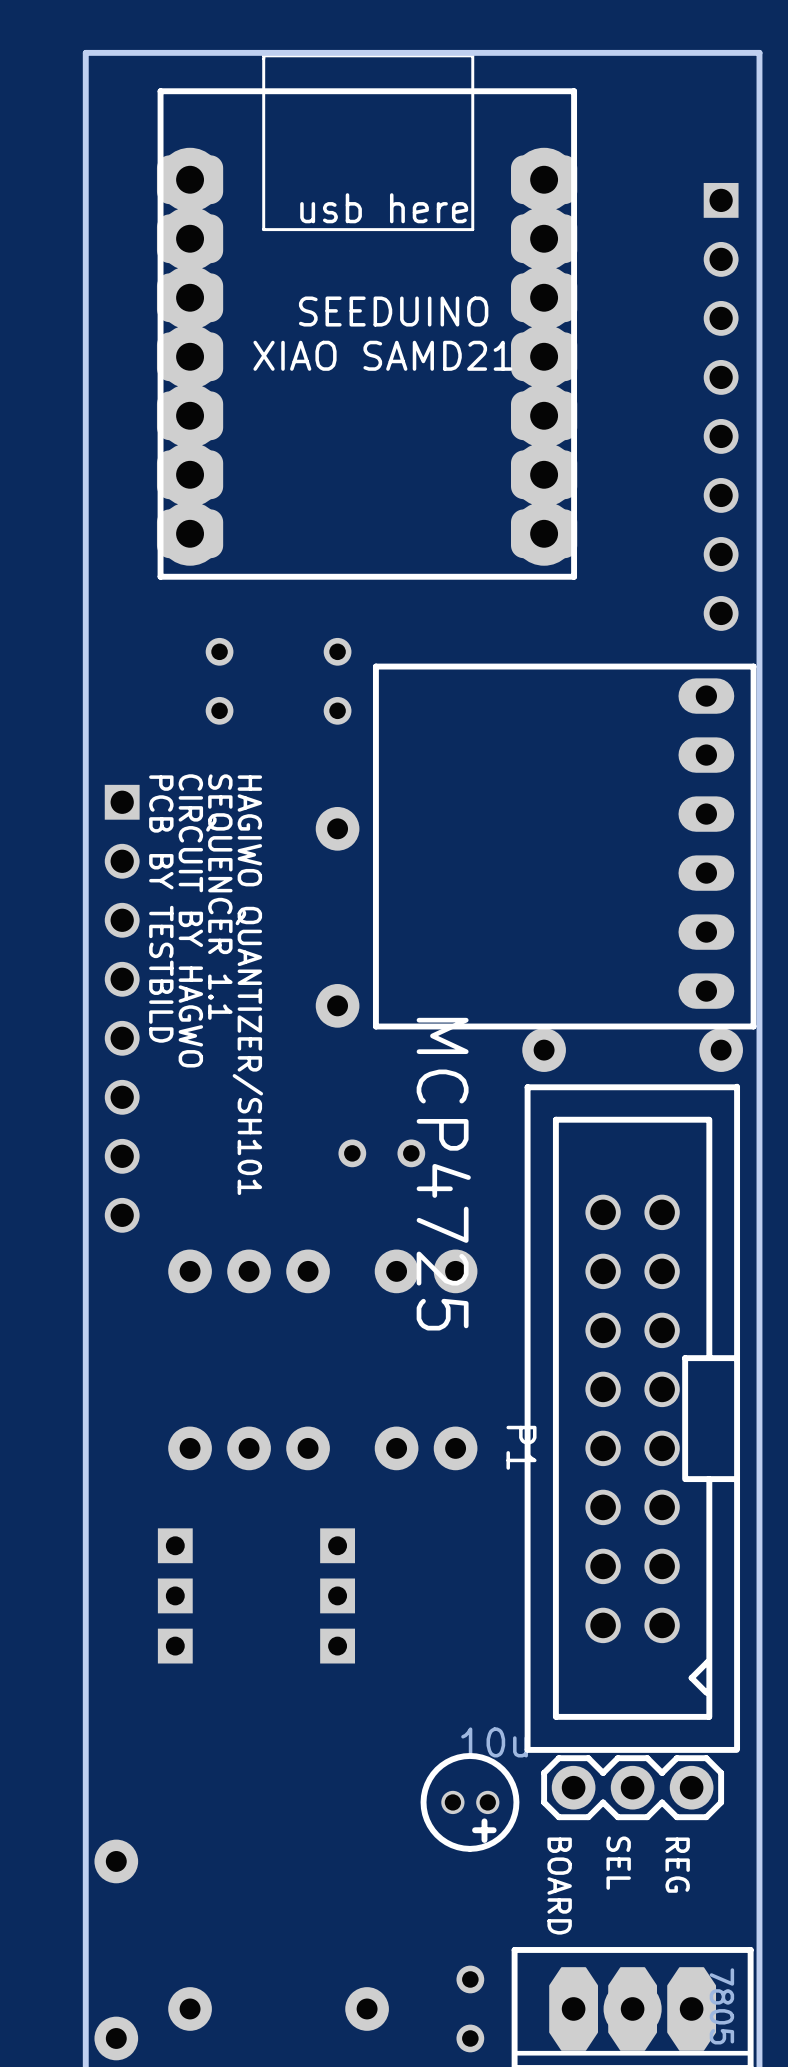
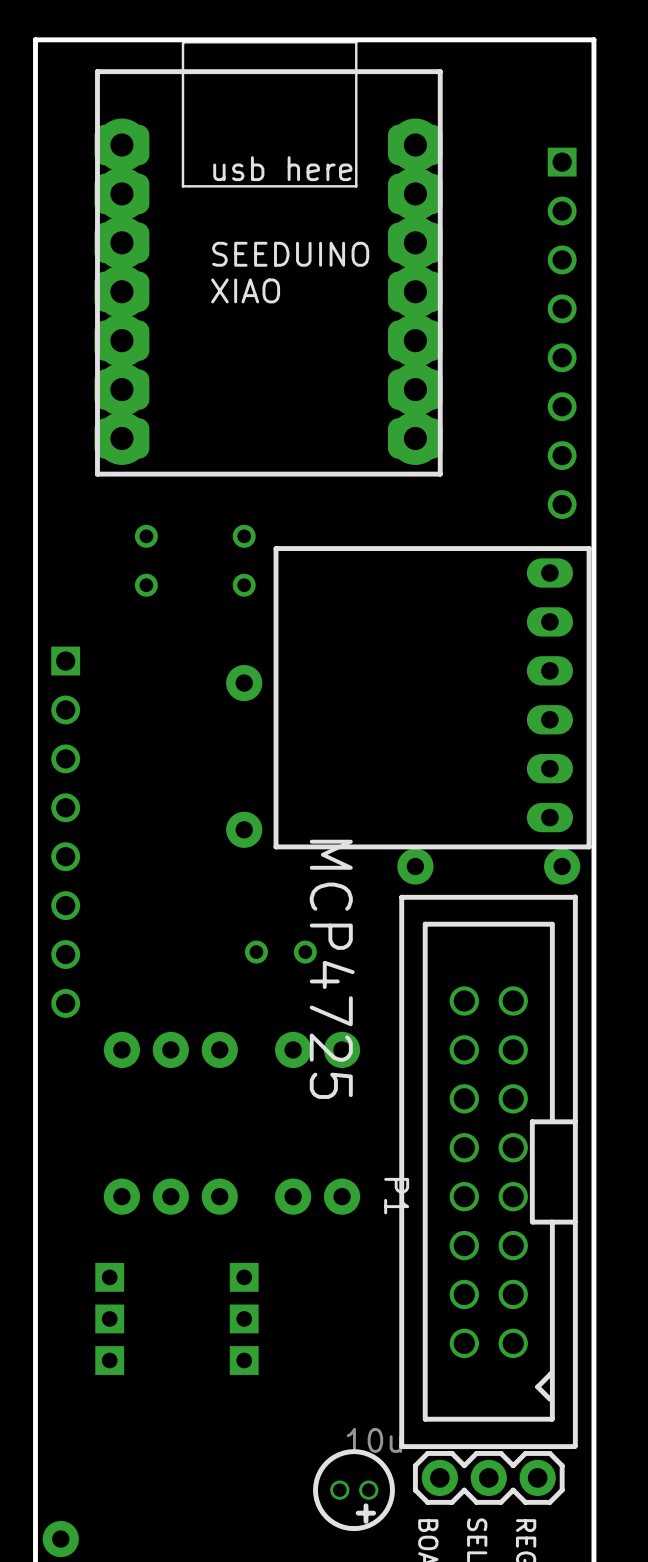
text: none -> XIAO (245, 290)
text: XIAO SAMD21 (382, 355) -> none
text: SEQUENCER 1.1 (219, 897) -> none
text: PCB BY TESTBILD (161, 909) -> none
text: CIRCUIT BY HAGWO (190, 920) -> none
text: HAGIWO QUANTIZER/SH101 (247, 985) -> none

